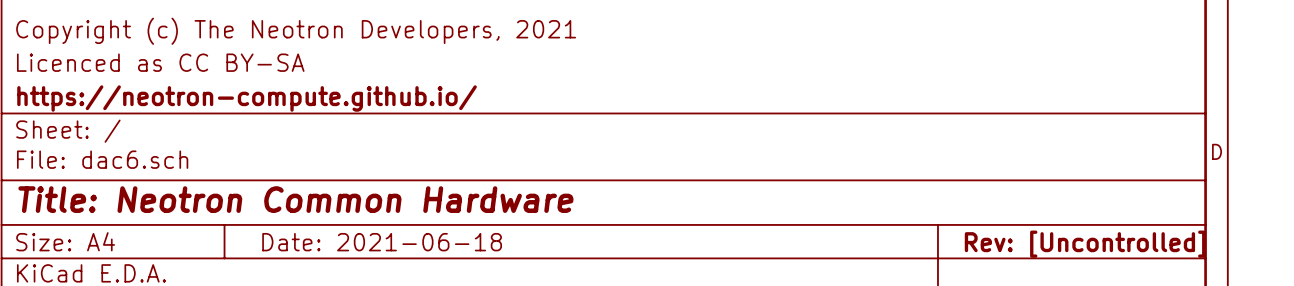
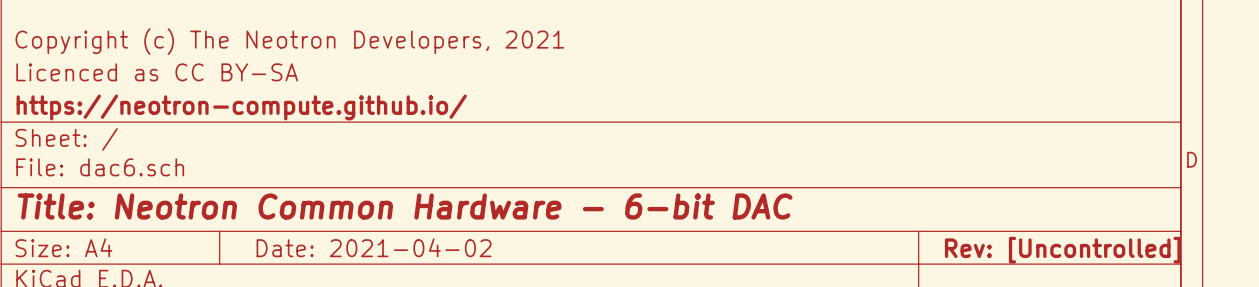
title block: Title: Neotron Common Hardware (295, 199) -> Title: Neotron Common Hardware - 6-bit DAC (405, 206)
title block: Date: 2021-06-18 (382, 242) -> Date: 2021-04-02 (374, 247)

